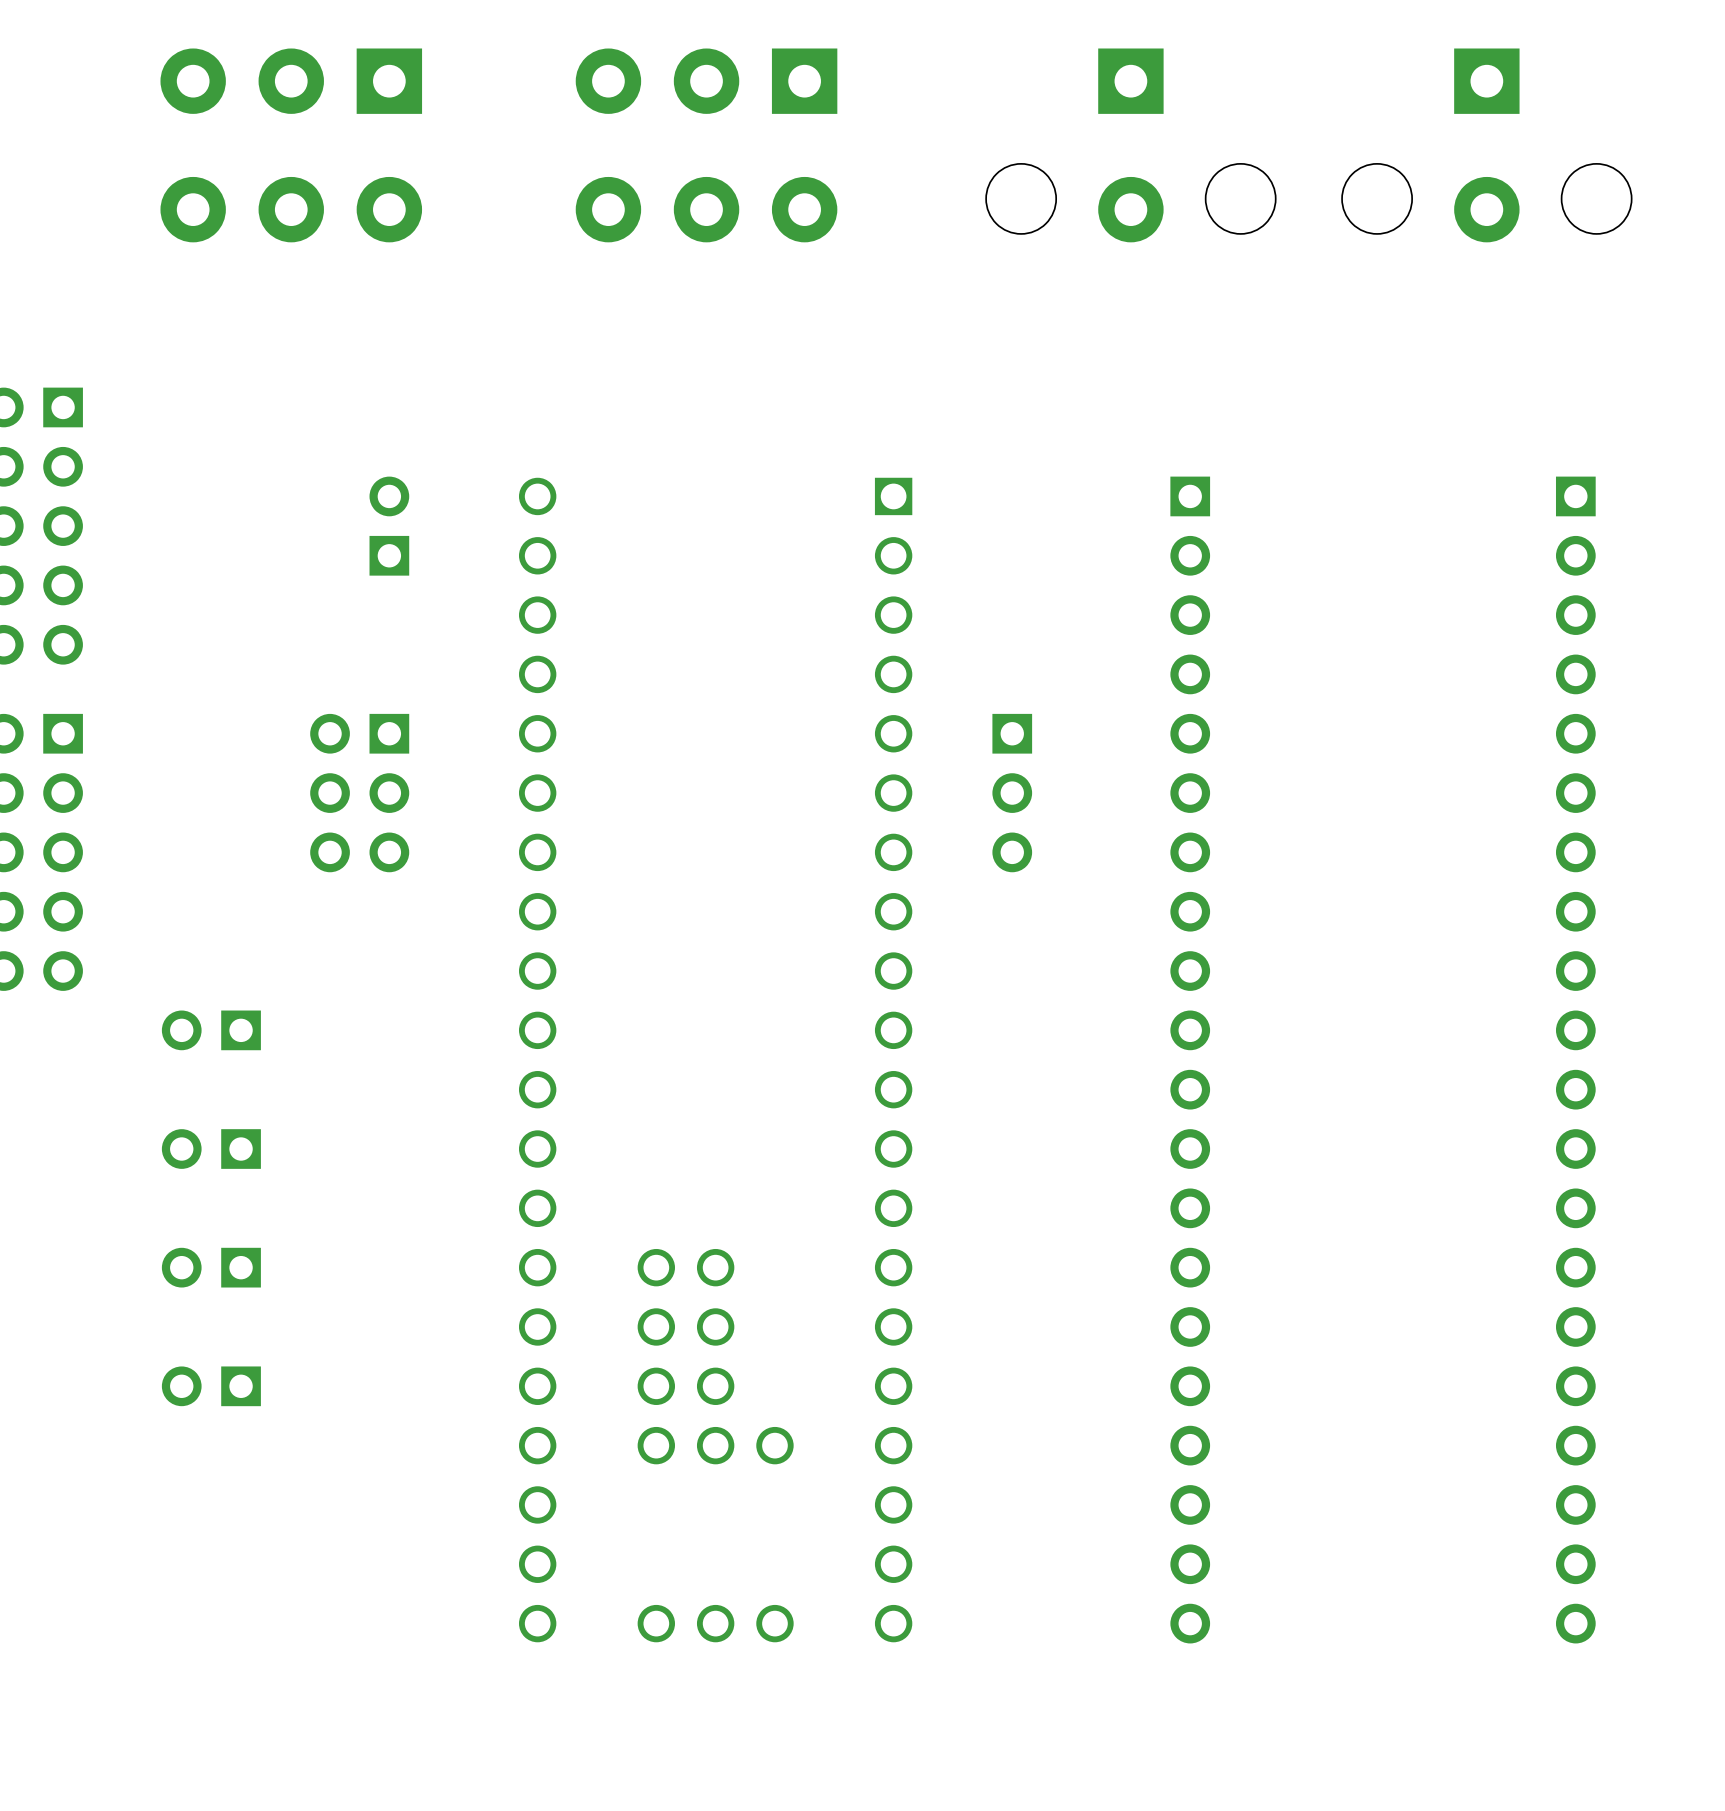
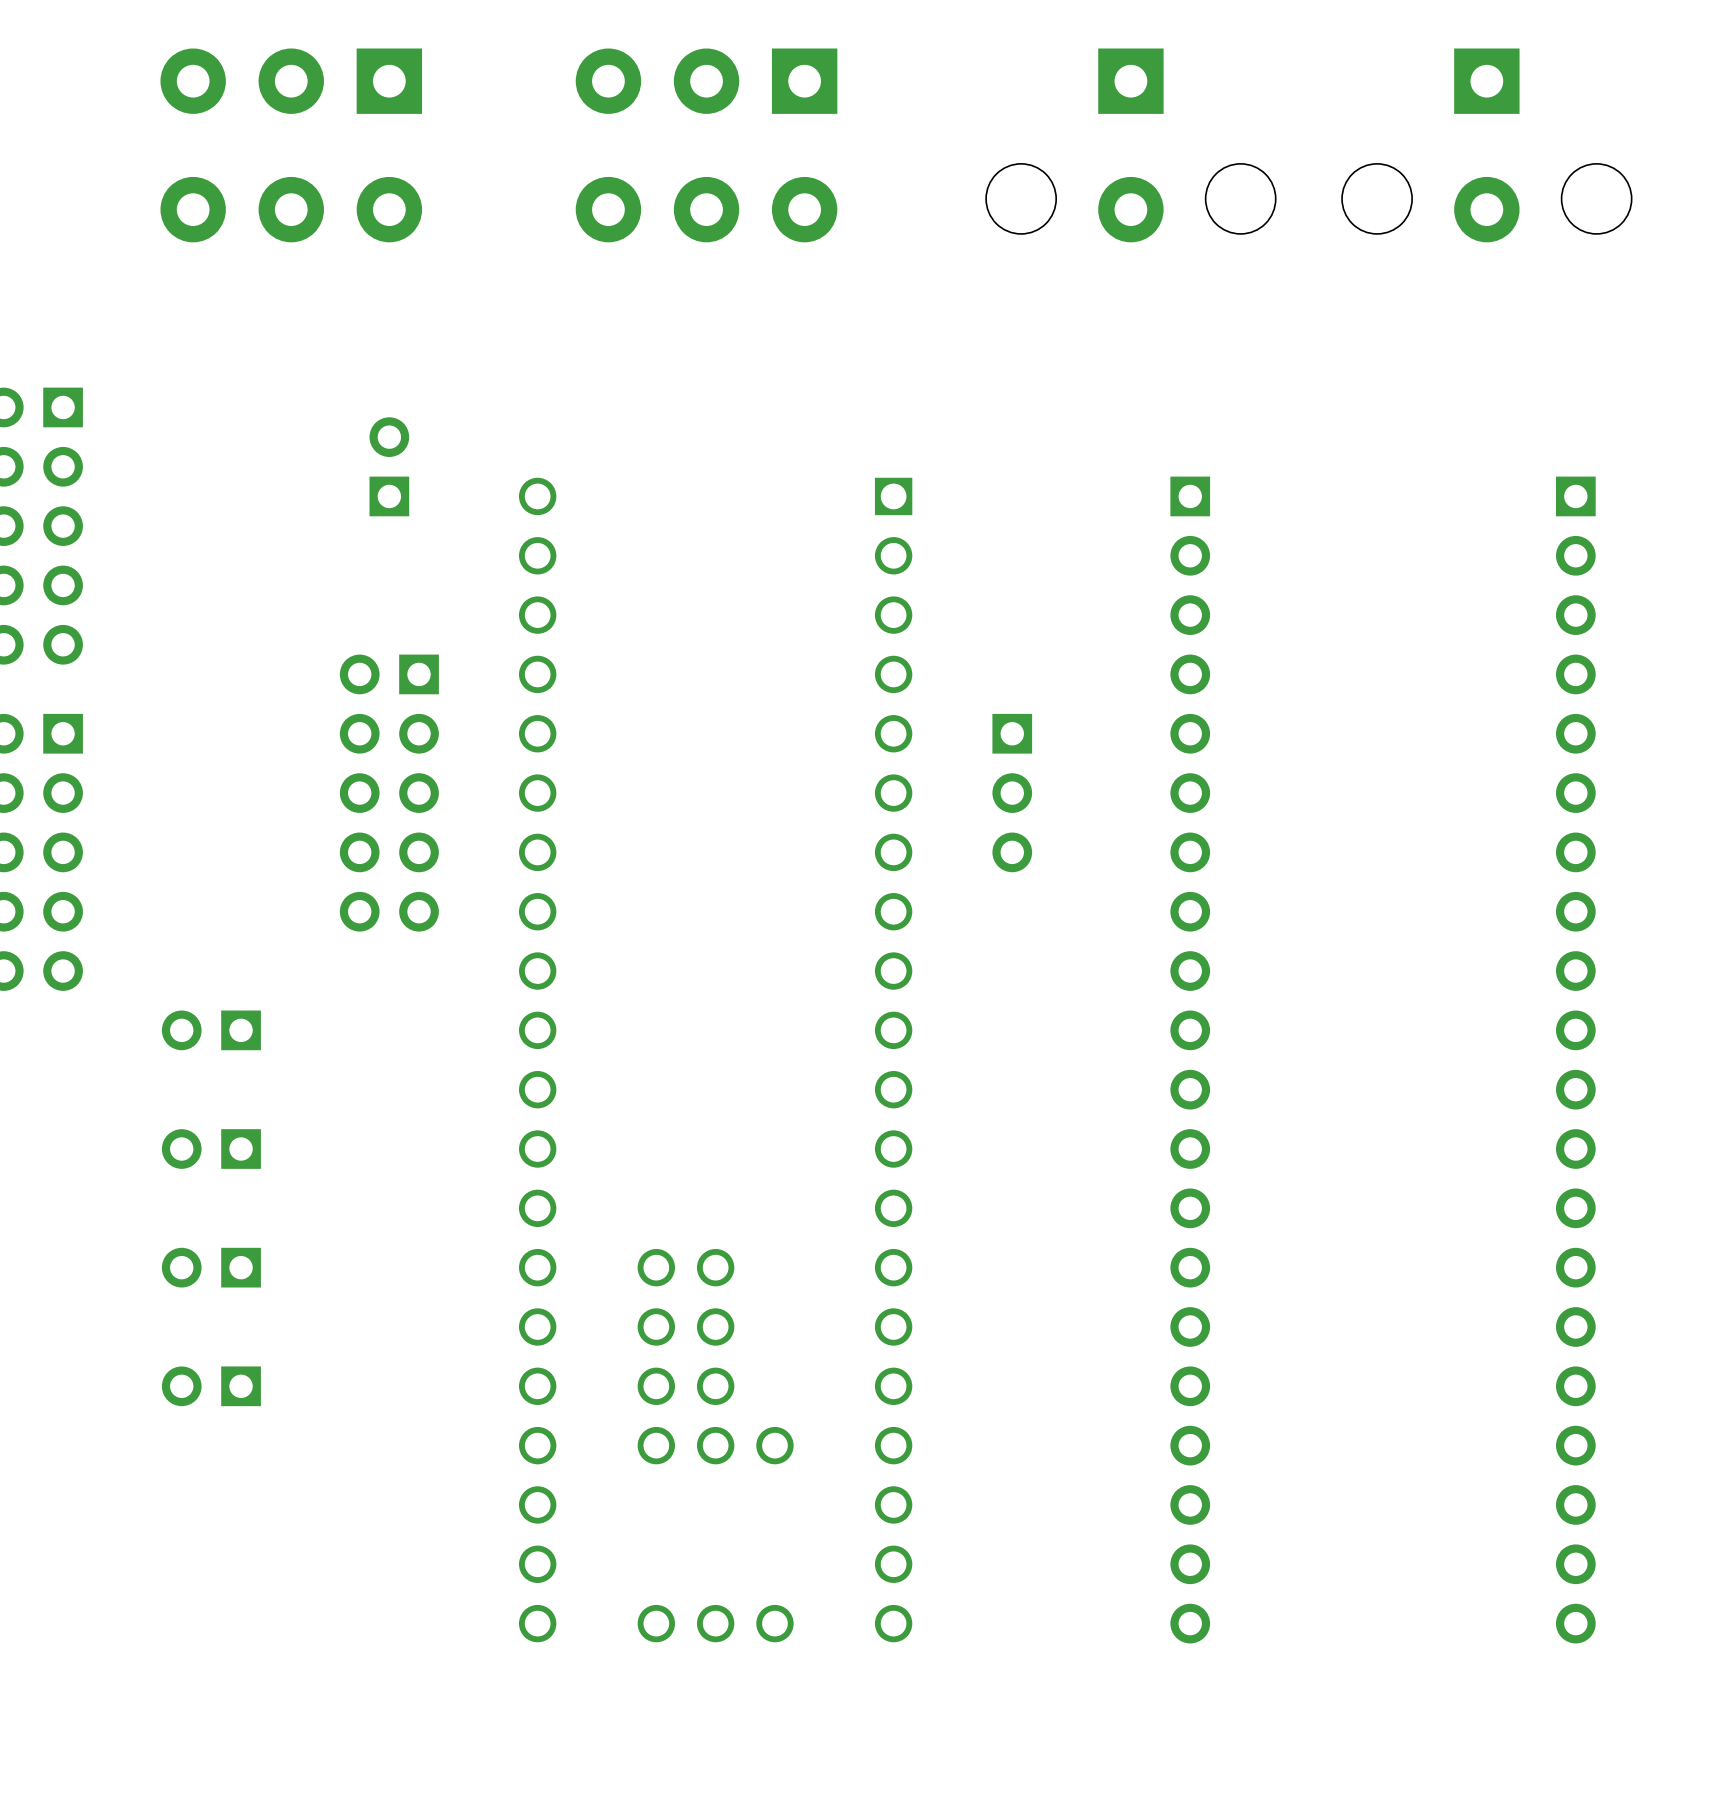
part position: (389, 526) -> (389, 466)
part: (359, 793) -> none
part: none -> (389, 793)

